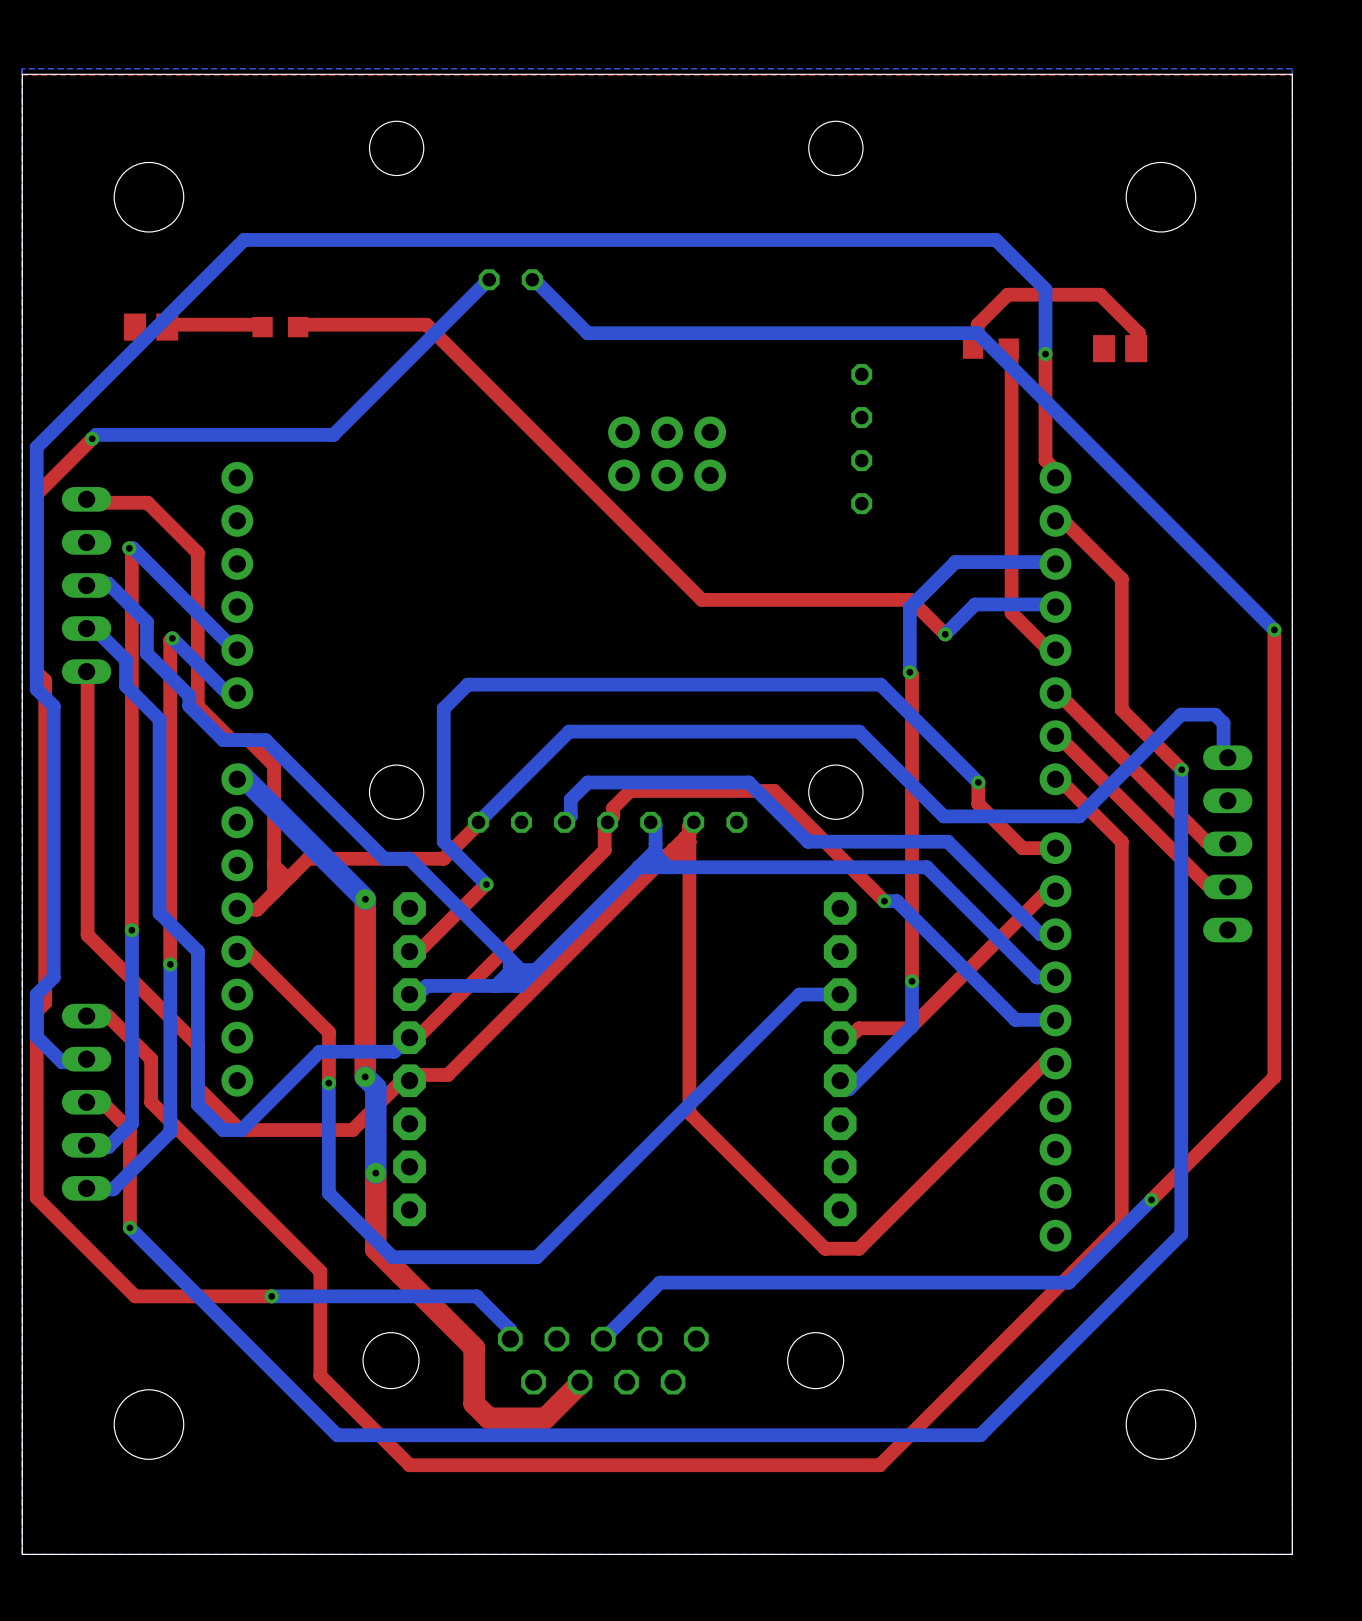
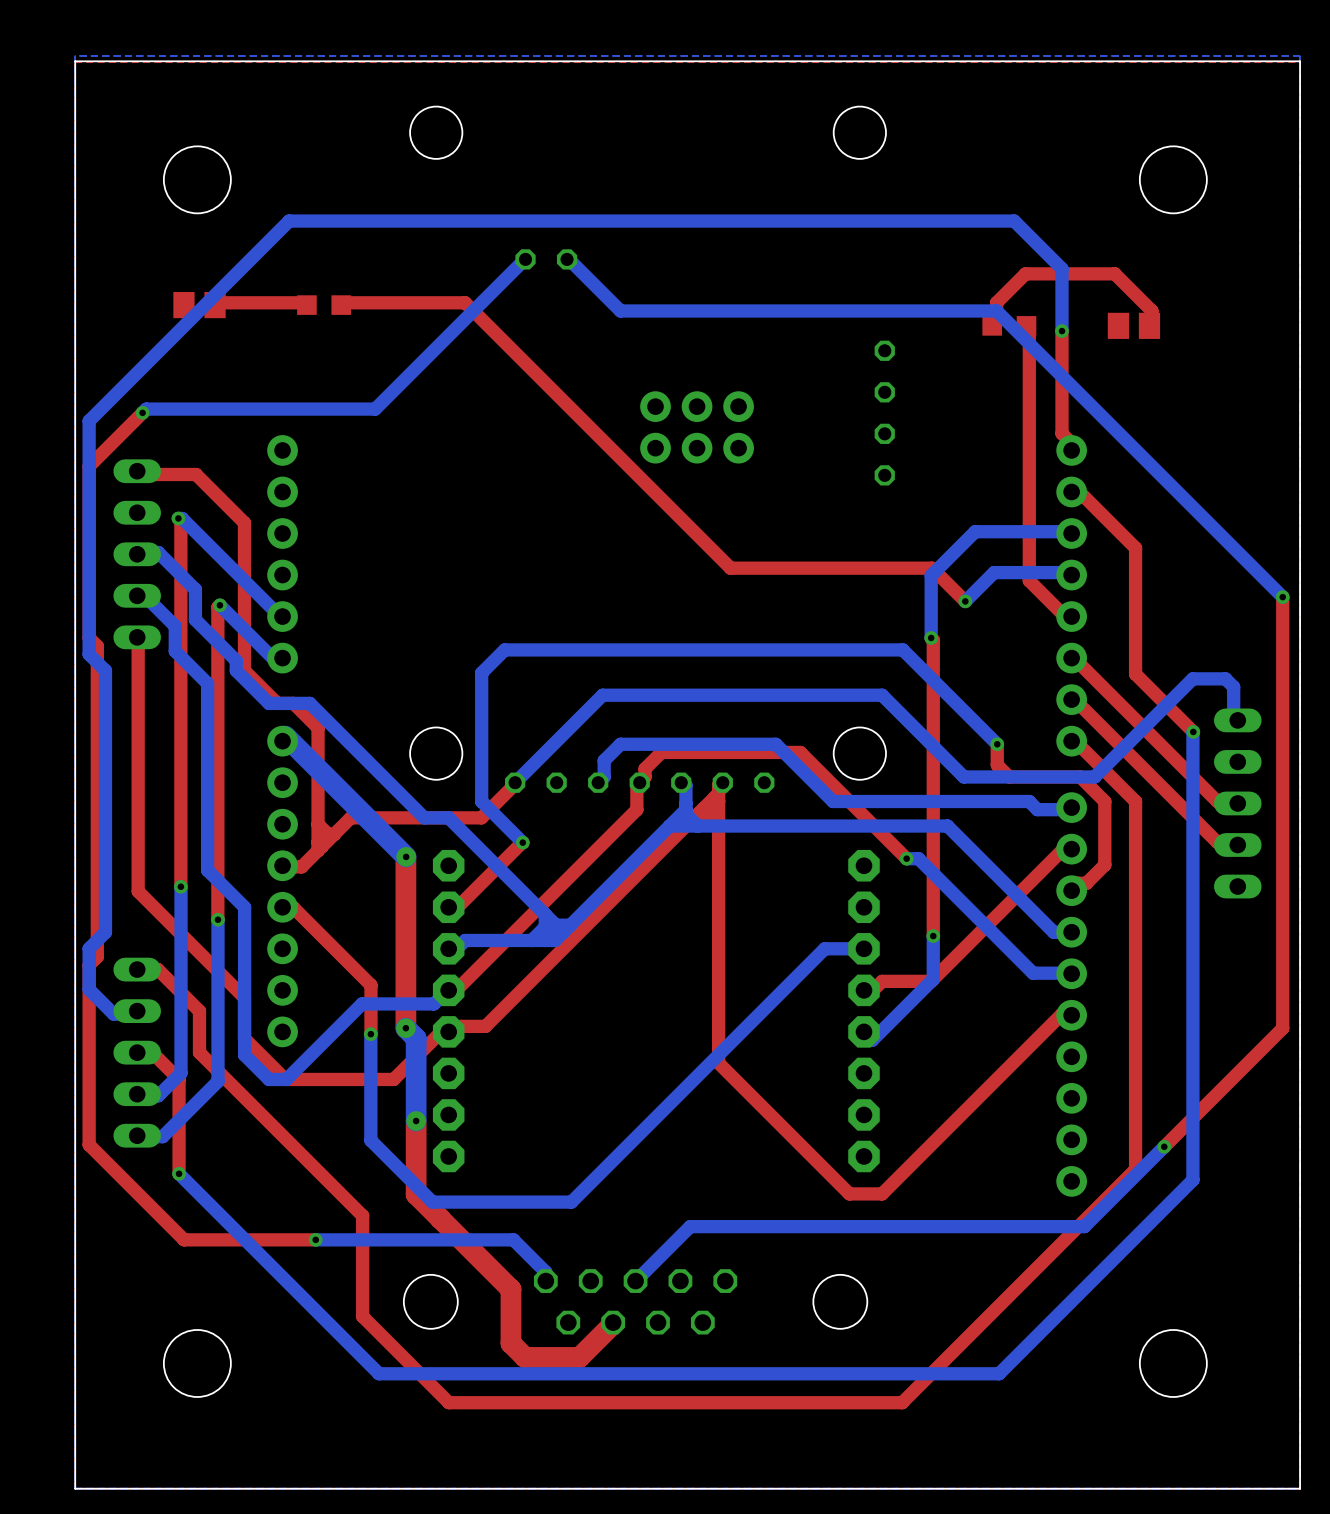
top track: (990, 816) (1022, 848) (1055, 848) -> (1009, 776) (1080, 776) (1104, 801) (1104, 864) (1086, 883) (1078, 883) (1071, 890)
bottom track: (808, 841) (947, 841) (1040, 934) (1055, 934) -> (833, 801) (1029, 801) (1037, 809) (1070, 809) (1071, 807)

